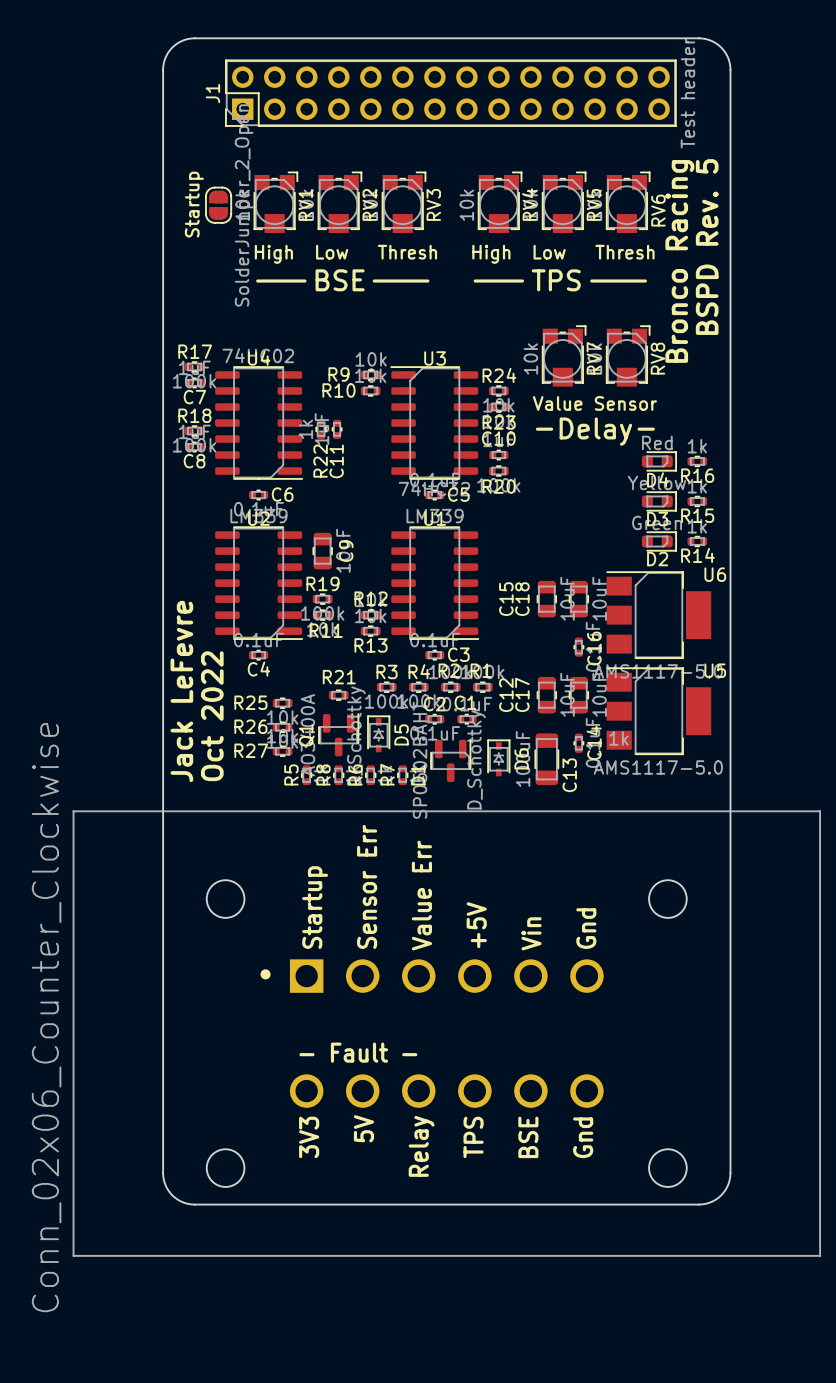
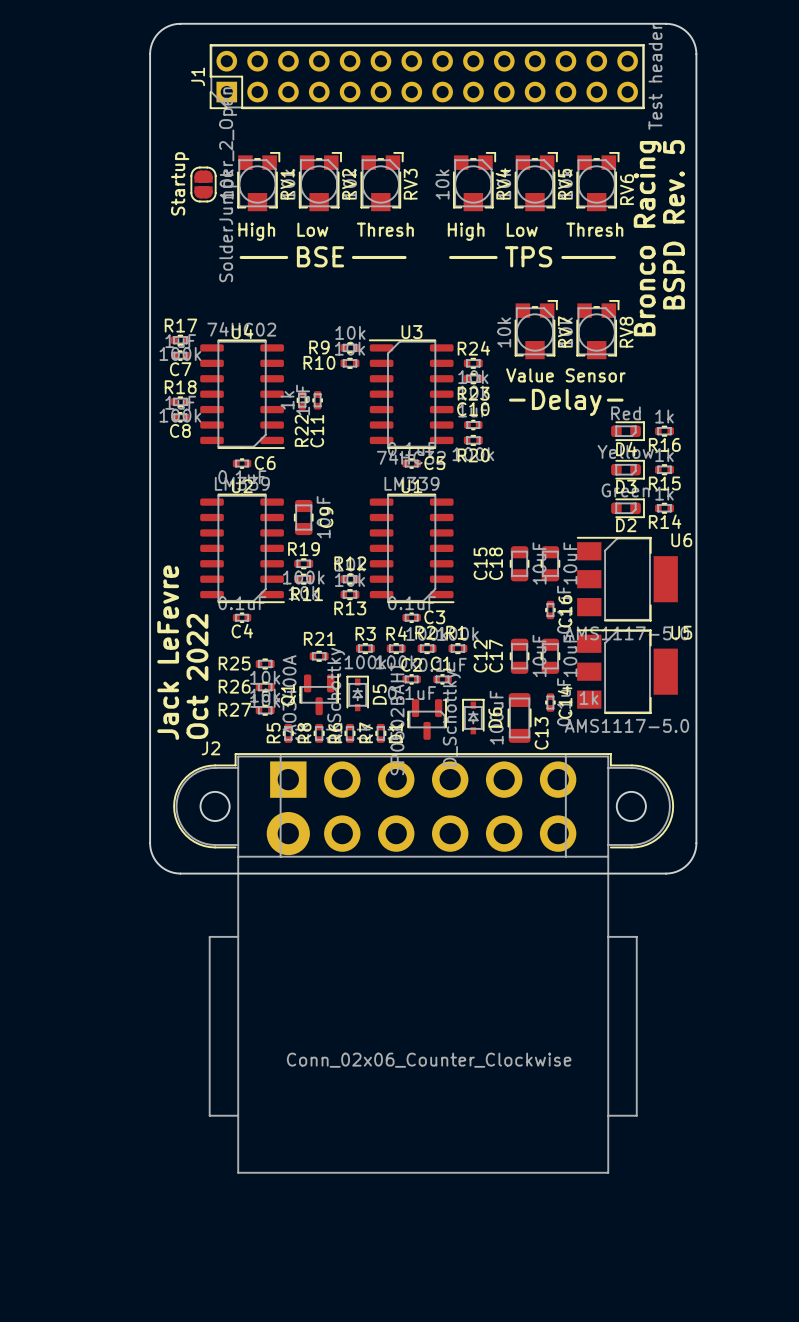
text: Sensor Err (367, 886) -> none
board edge: (163, 889) (163, 1176) (166, 1186) (172, 1195) (184, 1202) (194, 1204) (698, 1204) (715, 1199) (727, 1186) (730, 1173) (730, 889) -> (150, 843) (153, 856) (158, 864) (167, 870) (180, 873) (669, 873) (679, 870) (689, 862) (694, 853) (696, 843)
text: Value Err (421, 895) -> none
text: Startup (315, 907) -> none
text: +5V (476, 925) -> none
text: Gnd (586, 928) -> none
text: Vin (531, 933) -> none
J2: none -> Conn_02x06_Counter_Clockwise (423, 963)
part: Conn_02x06_Counter_Clockwise (446, 1033) -> none
text: - Fault - (358, 1052) -> none
text: 5V (363, 1128) -> none
text: 3V3 (309, 1137) -> none
text: TPS (473, 1137) -> none
text: BSE (528, 1137) -> none
text: Gnd (583, 1137) -> none
text: Relay (421, 1146) -> none

